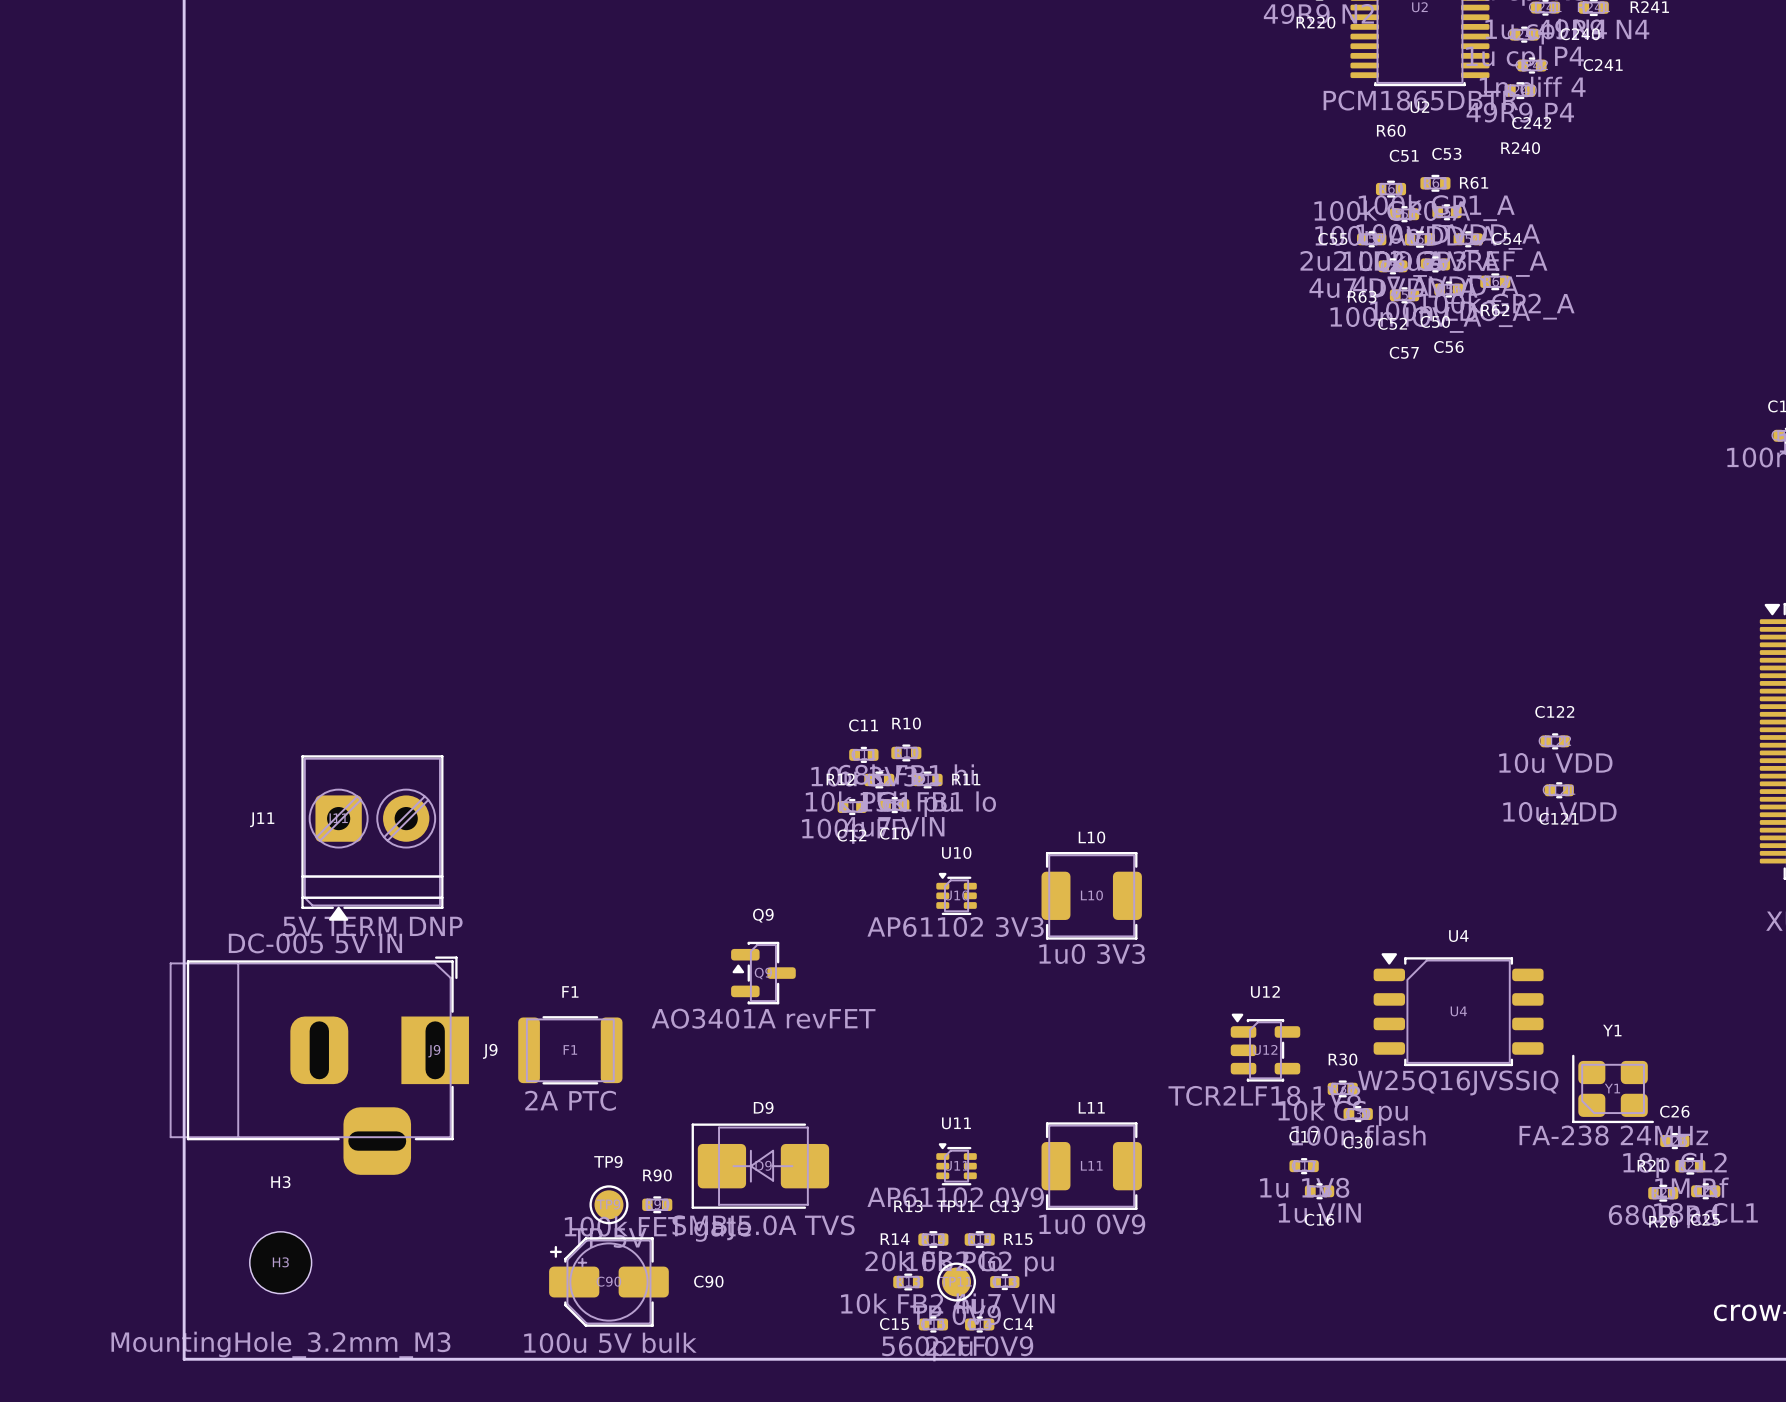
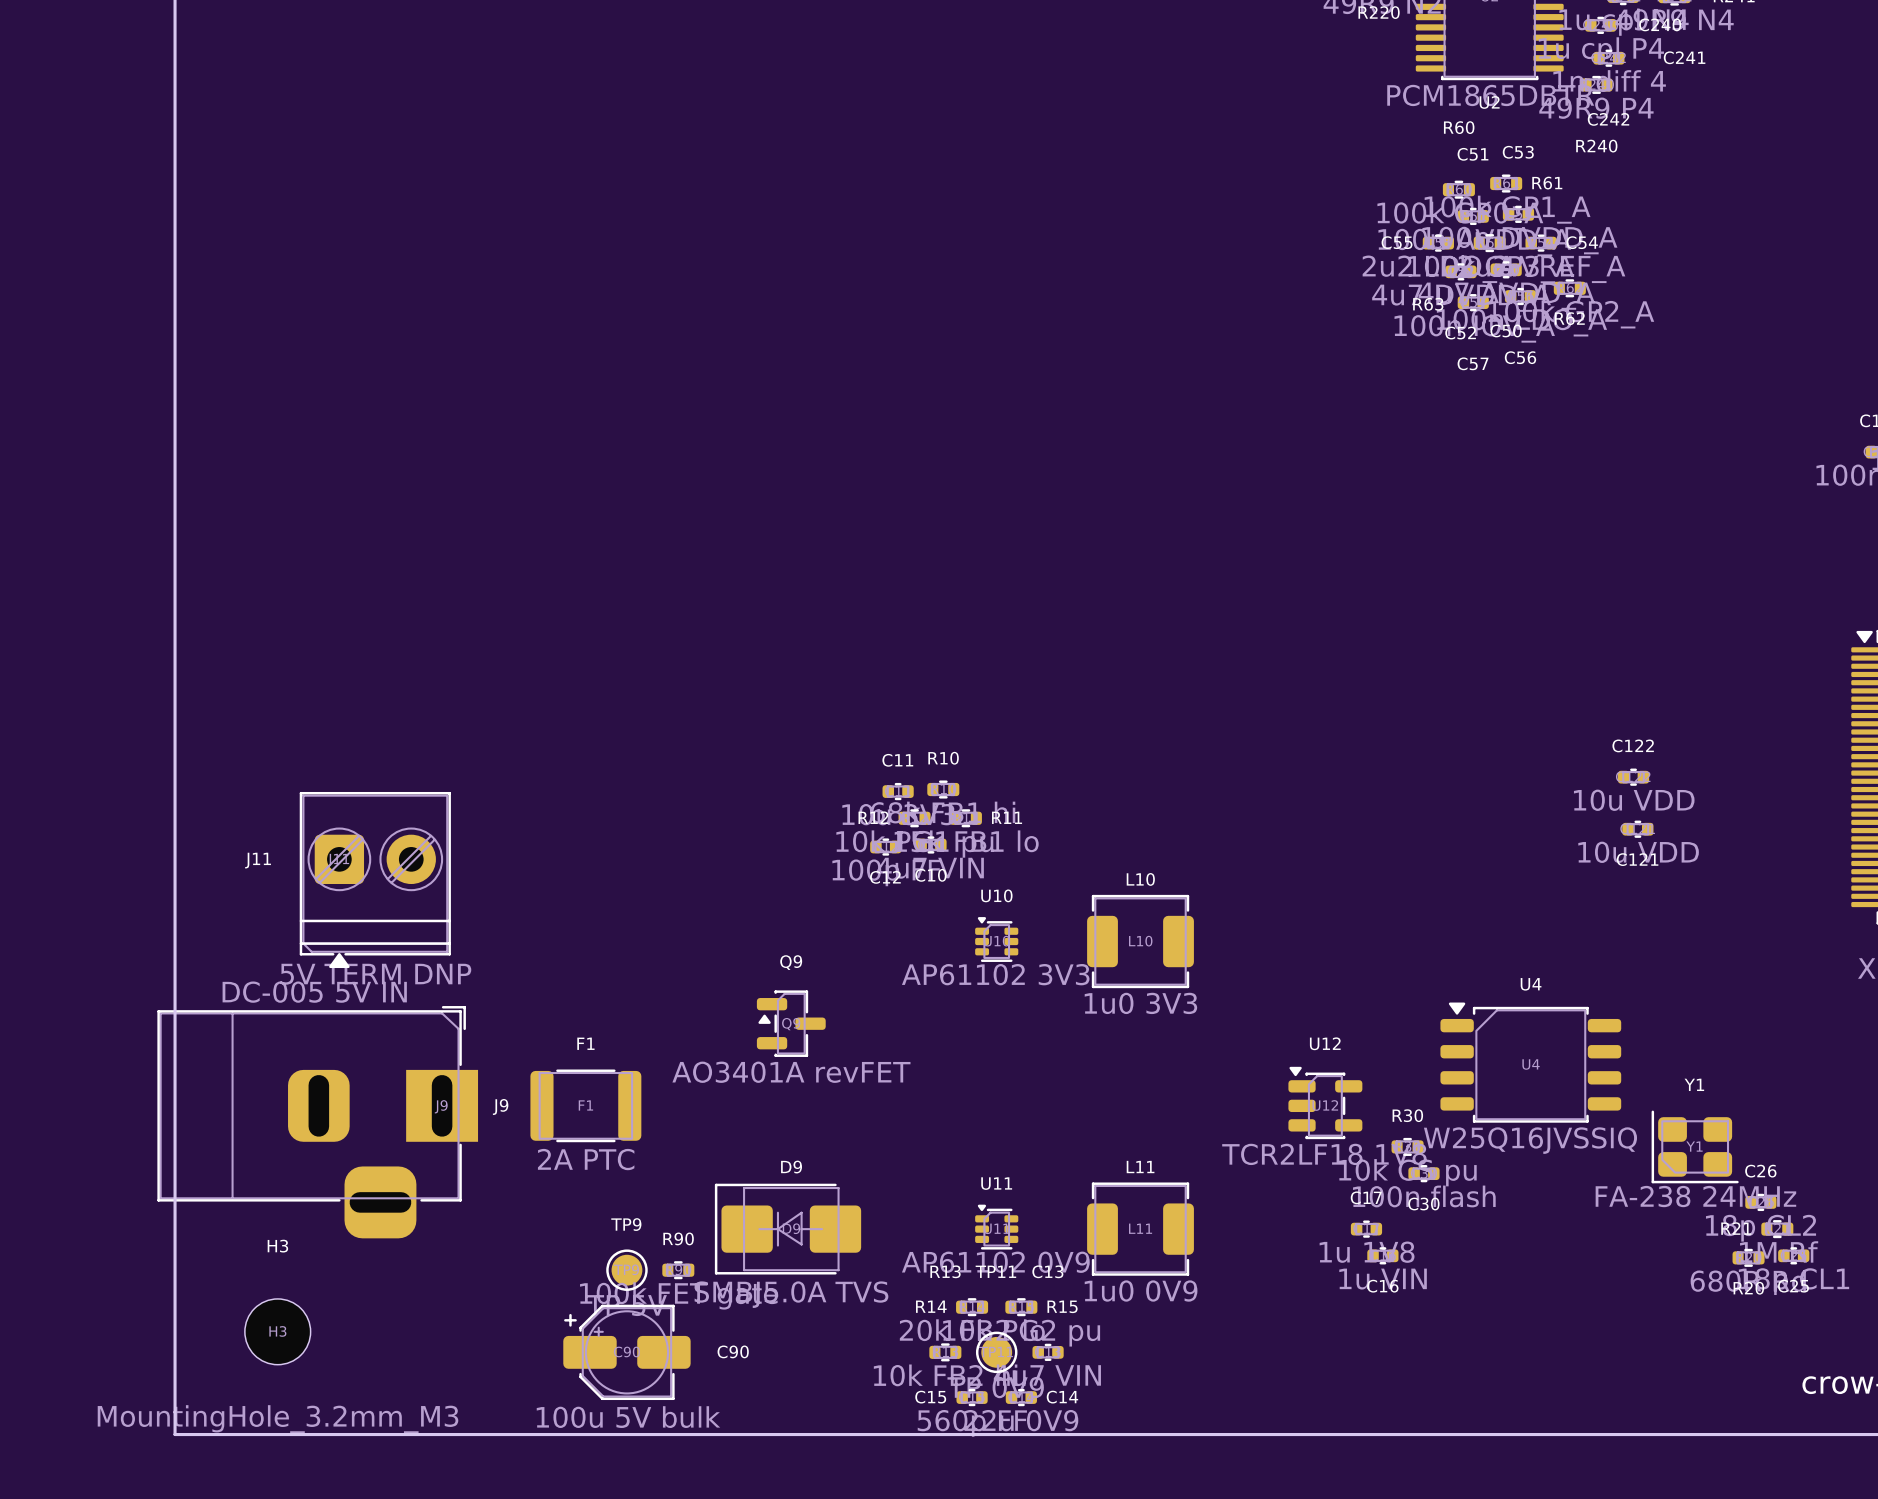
J9 footprint: [169, 956, 469, 1175] -> [157, 1006, 479, 1239]

